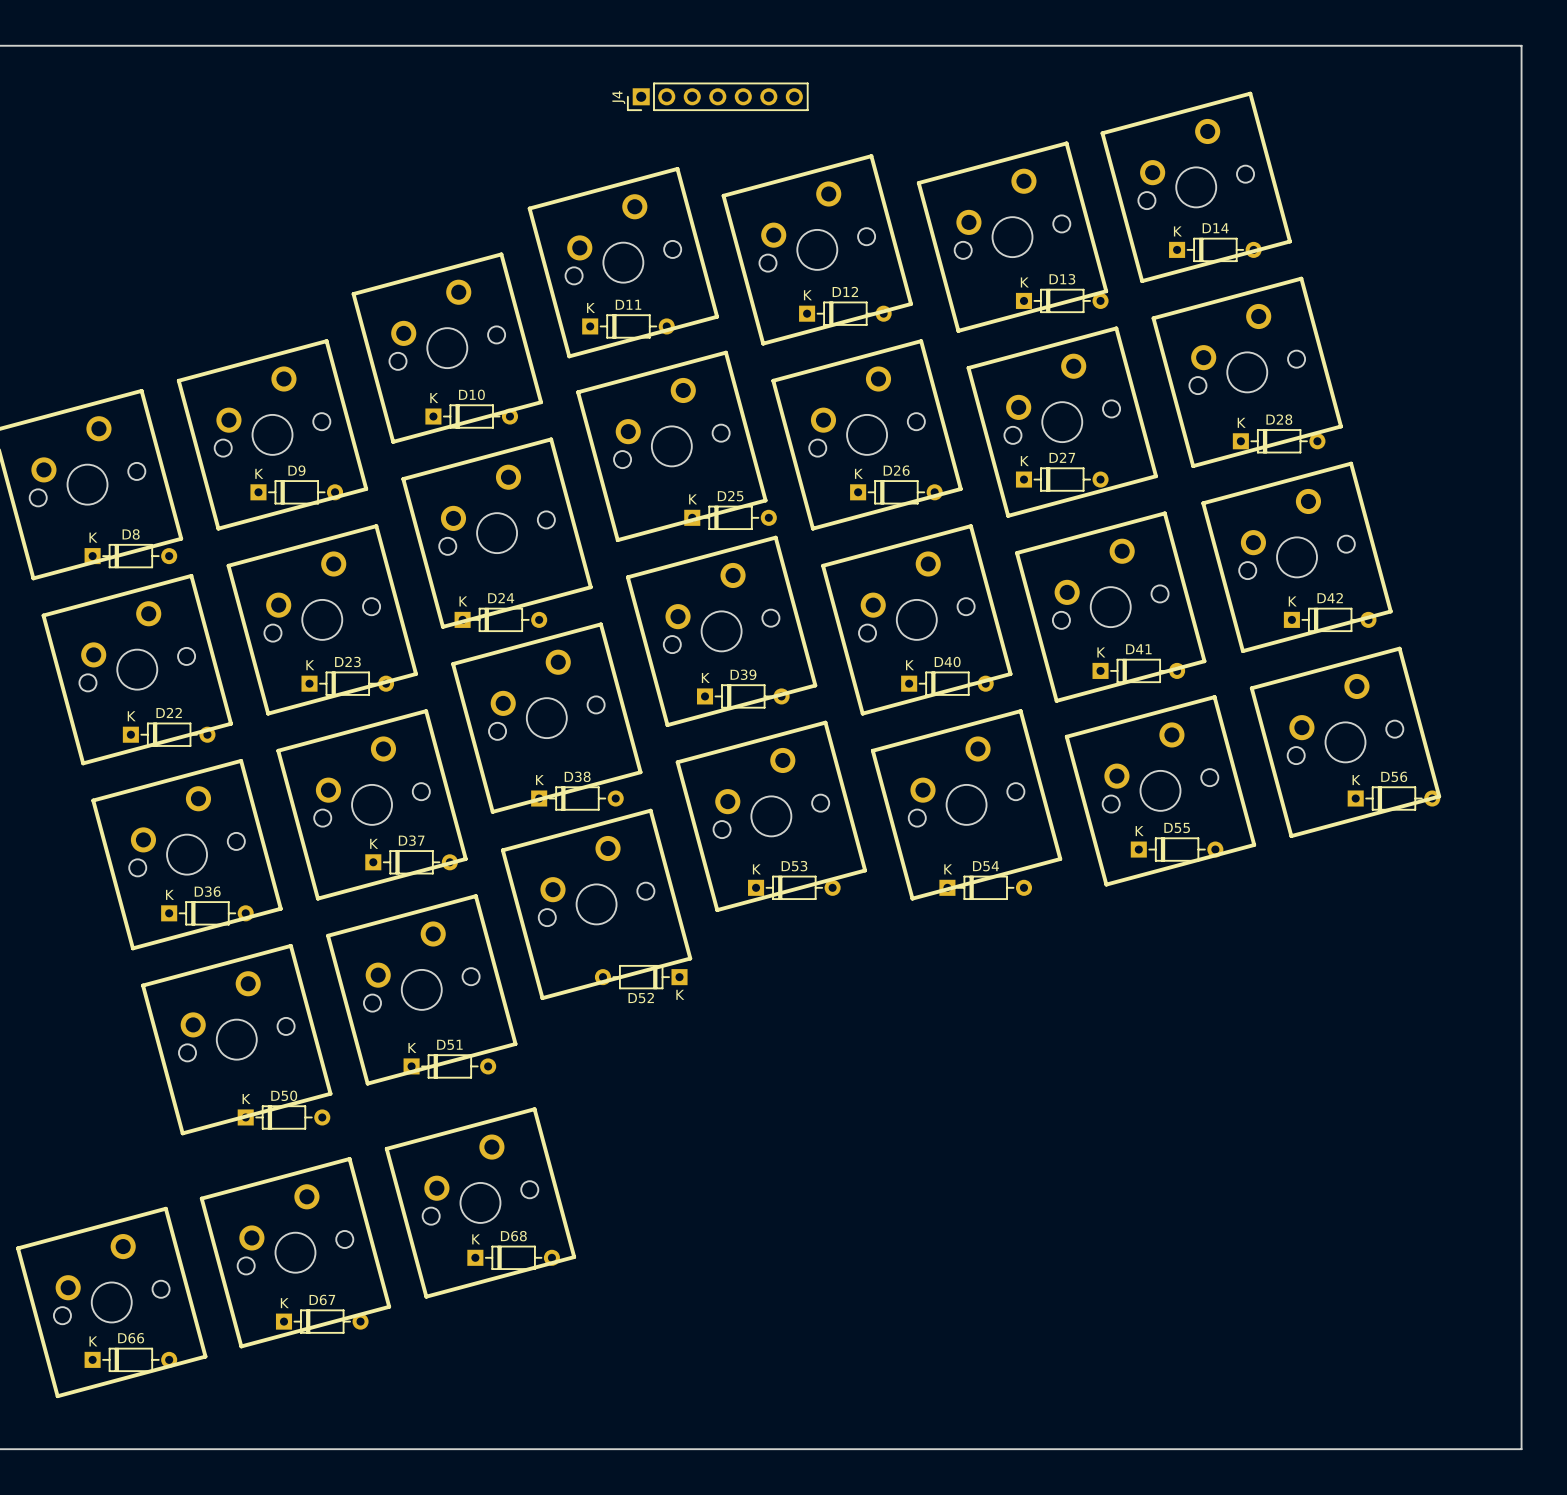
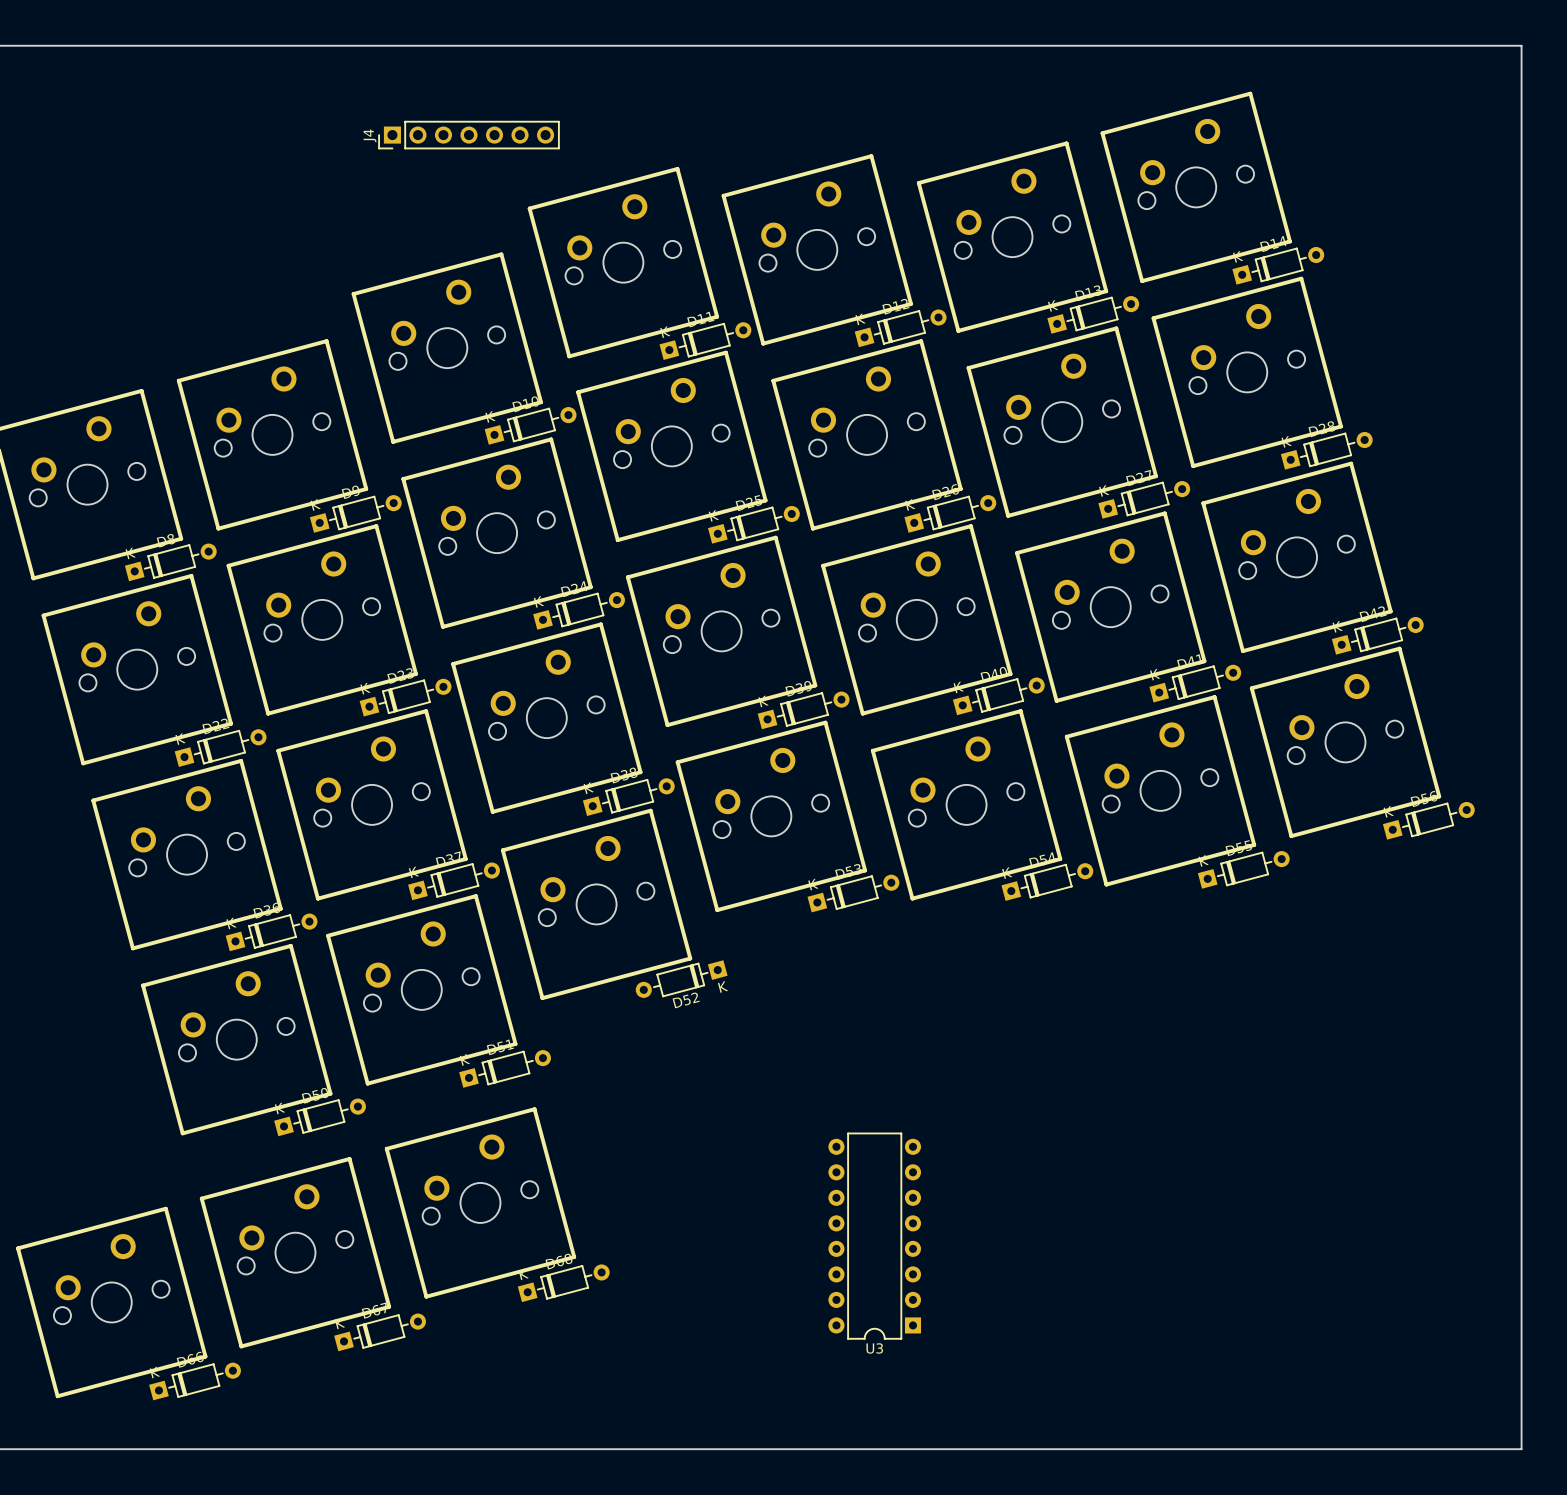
J4 position: (717, 96) -> (468, 135)
D14 rotation: 0° (1215, 249) -> 15° counterclockwise (1278, 265)
D14 position: (1215, 249) -> (1278, 265)
D13 rotation: 0° (1062, 300) -> 15° counterclockwise (1093, 314)
D12 rotation: 0° (845, 313) -> 15° counterclockwise (900, 328)
D12 position: (845, 313) -> (900, 328)
D11 rotation: 0° (628, 326) -> 15° counterclockwise (705, 341)
D11 position: (628, 326) -> (705, 341)
D10 rotation: 0° (471, 416) -> 15° counterclockwise (530, 425)
D10 position: (471, 416) -> (530, 425)
D28 rotation: 0° (1279, 441) -> 15° counterclockwise (1326, 450)
D27 rotation: 0° (1062, 479) -> 15° counterclockwise (1144, 499)
D27 position: (1062, 479) -> (1144, 499)
D9 rotation: 0° (296, 492) -> 15° counterclockwise (355, 513)
D9 position: (296, 492) -> (355, 513)
D26 rotation: 0° (896, 492) -> 15° counterclockwise (950, 513)
D26 position: (896, 492) -> (950, 513)
D25 rotation: 0° (730, 517) -> 15° counterclockwise (753, 524)
D8 rotation: 0° (130, 556) -> 15° counterclockwise (170, 562)
D24 rotation: 0° (500, 619) -> 15° counterclockwise (579, 610)
D24 position: (500, 619) -> (579, 610)
D42 rotation: 0° (1330, 619) -> 15° counterclockwise (1377, 635)
D41 rotation: 0° (1138, 670) -> 15° counterclockwise (1195, 683)
D41 position: (1138, 670) -> (1195, 683)
D23 rotation: 0° (347, 683) -> 15° counterclockwise (405, 697)
D23 position: (347, 683) -> (405, 697)
D40 rotation: 0° (947, 683) -> 15° counterclockwise (998, 696)
D39 rotation: 0° (743, 696) -> 15° counterclockwise (803, 710)
D39 position: (743, 696) -> (803, 710)
D22 rotation: 0° (169, 734) -> 15° counterclockwise (220, 748)
D38 rotation: 0° (577, 798) -> 15° counterclockwise (628, 797)
D56 rotation: 0° (1393, 798) -> 15° counterclockwise (1428, 820)
D55 rotation: 0° (1177, 849) -> 15° counterclockwise (1243, 869)
D55 position: (1177, 849) -> (1243, 869)
D37 rotation: 0° (411, 862) -> 15° counterclockwise (454, 881)
D53 rotation: 0° (794, 887) -> 15° counterclockwise (853, 893)
D53 position: (794, 887) -> (853, 893)
D54 rotation: 0° (985, 887) -> 15° counterclockwise (1047, 882)
D54 position: (985, 887) -> (1047, 882)
D36 rotation: 0° (207, 913) -> 15° counterclockwise (271, 932)
D36 position: (207, 913) -> (271, 932)
D52 rotation: 0° (641, 977) -> 15° counterclockwise (681, 979)
D51 rotation: 0° (449, 1066) -> 15° counterclockwise (505, 1068)
D50 rotation: 0° (283, 1117) -> 15° counterclockwise (320, 1117)
U3: none -> (874, 1236)
D68 rotation: 0° (513, 1257) -> 15° counterclockwise (563, 1283)
D68 position: (513, 1257) -> (563, 1283)
D67 rotation: 0° (322, 1321) -> 15° counterclockwise (380, 1332)
D67 position: (322, 1321) -> (380, 1332)
D66 rotation: 0° (130, 1359) -> 15° counterclockwise (195, 1381)
D66 position: (130, 1359) -> (195, 1381)

